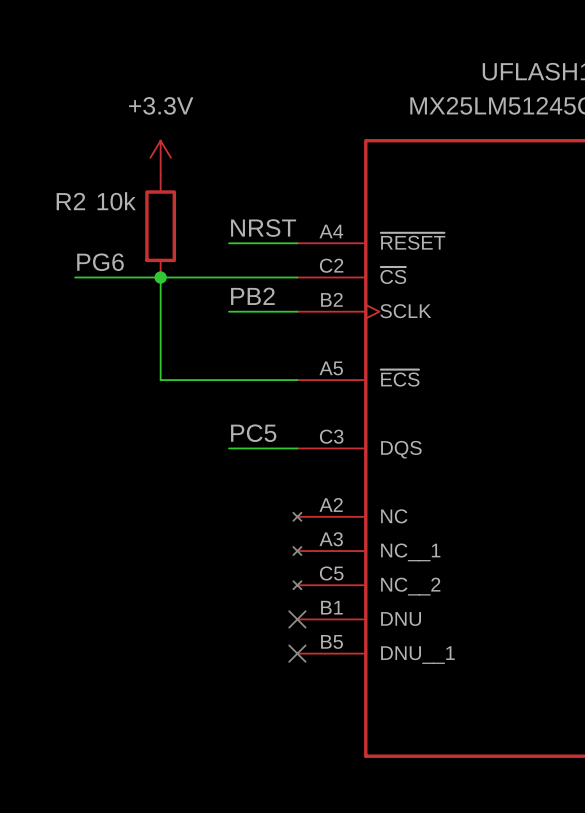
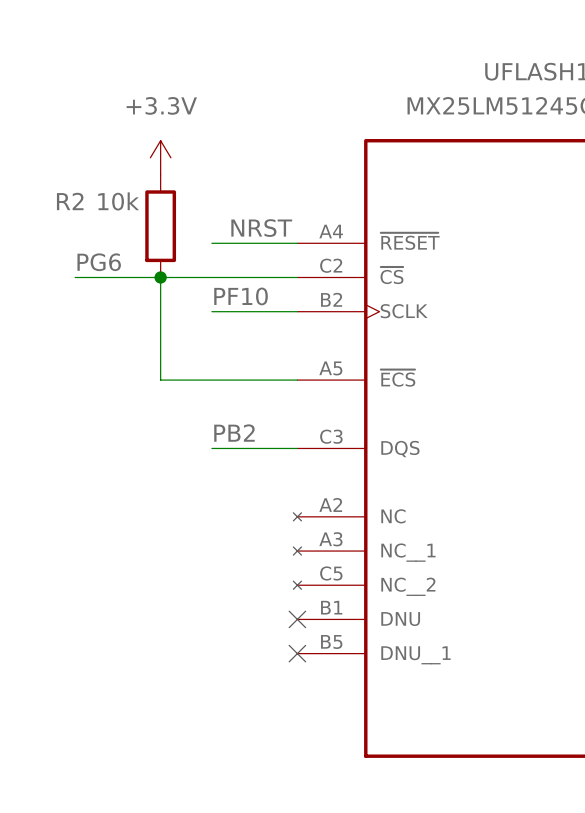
wire: none -> (211, 243) (229, 243)
label: none -> PF10 (241, 296)
label position: PB2 (252, 296) -> PB2 (234, 433)
wire: none -> (211, 311) (229, 311)
label: PC5 (253, 433) -> none
wire: none -> (211, 448) (229, 448)

